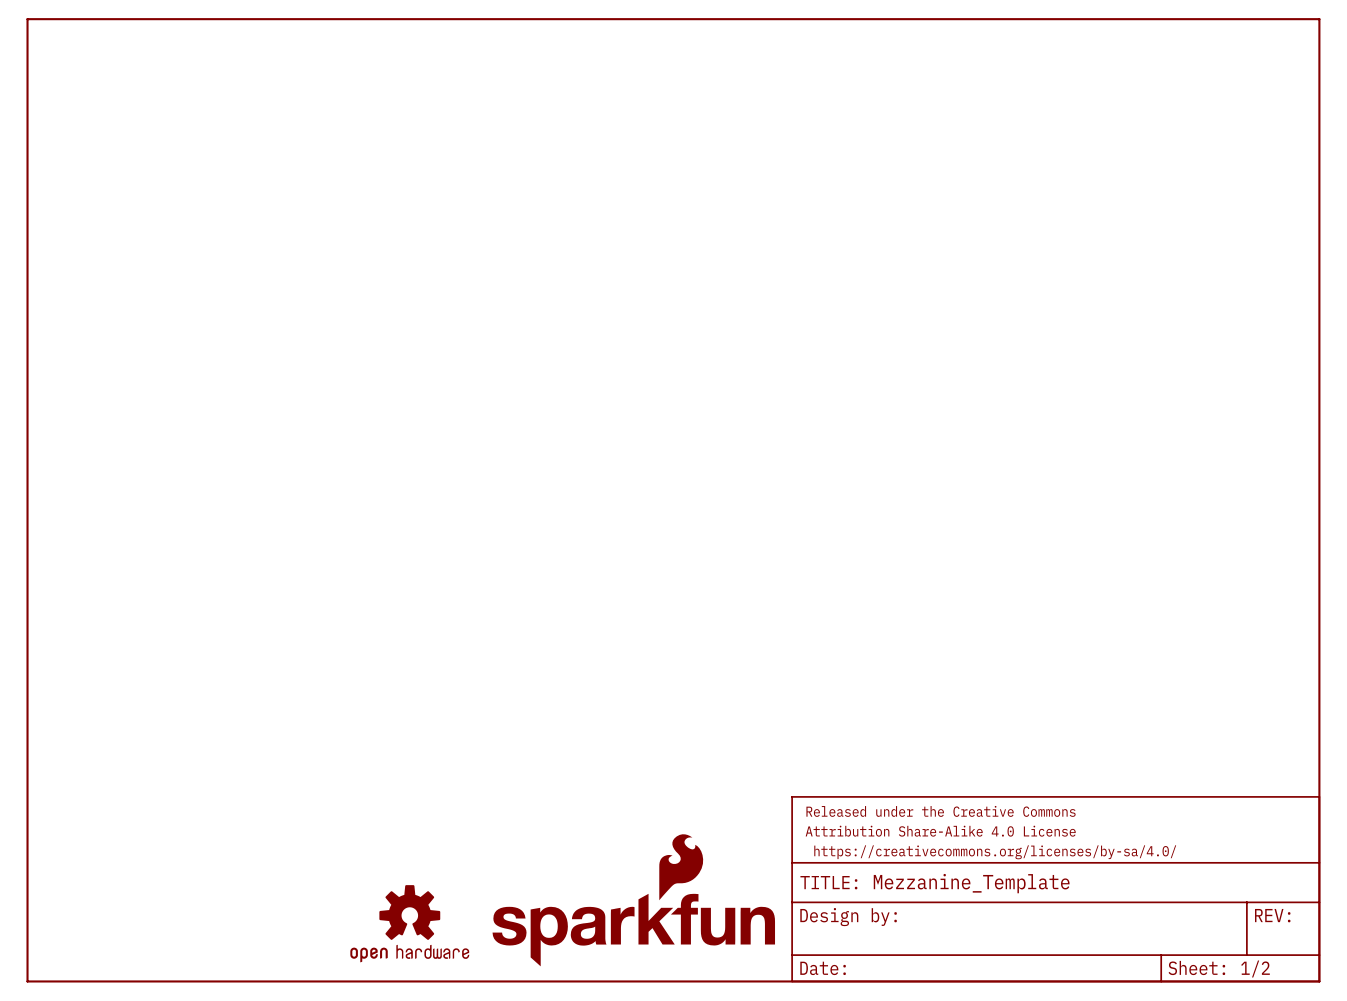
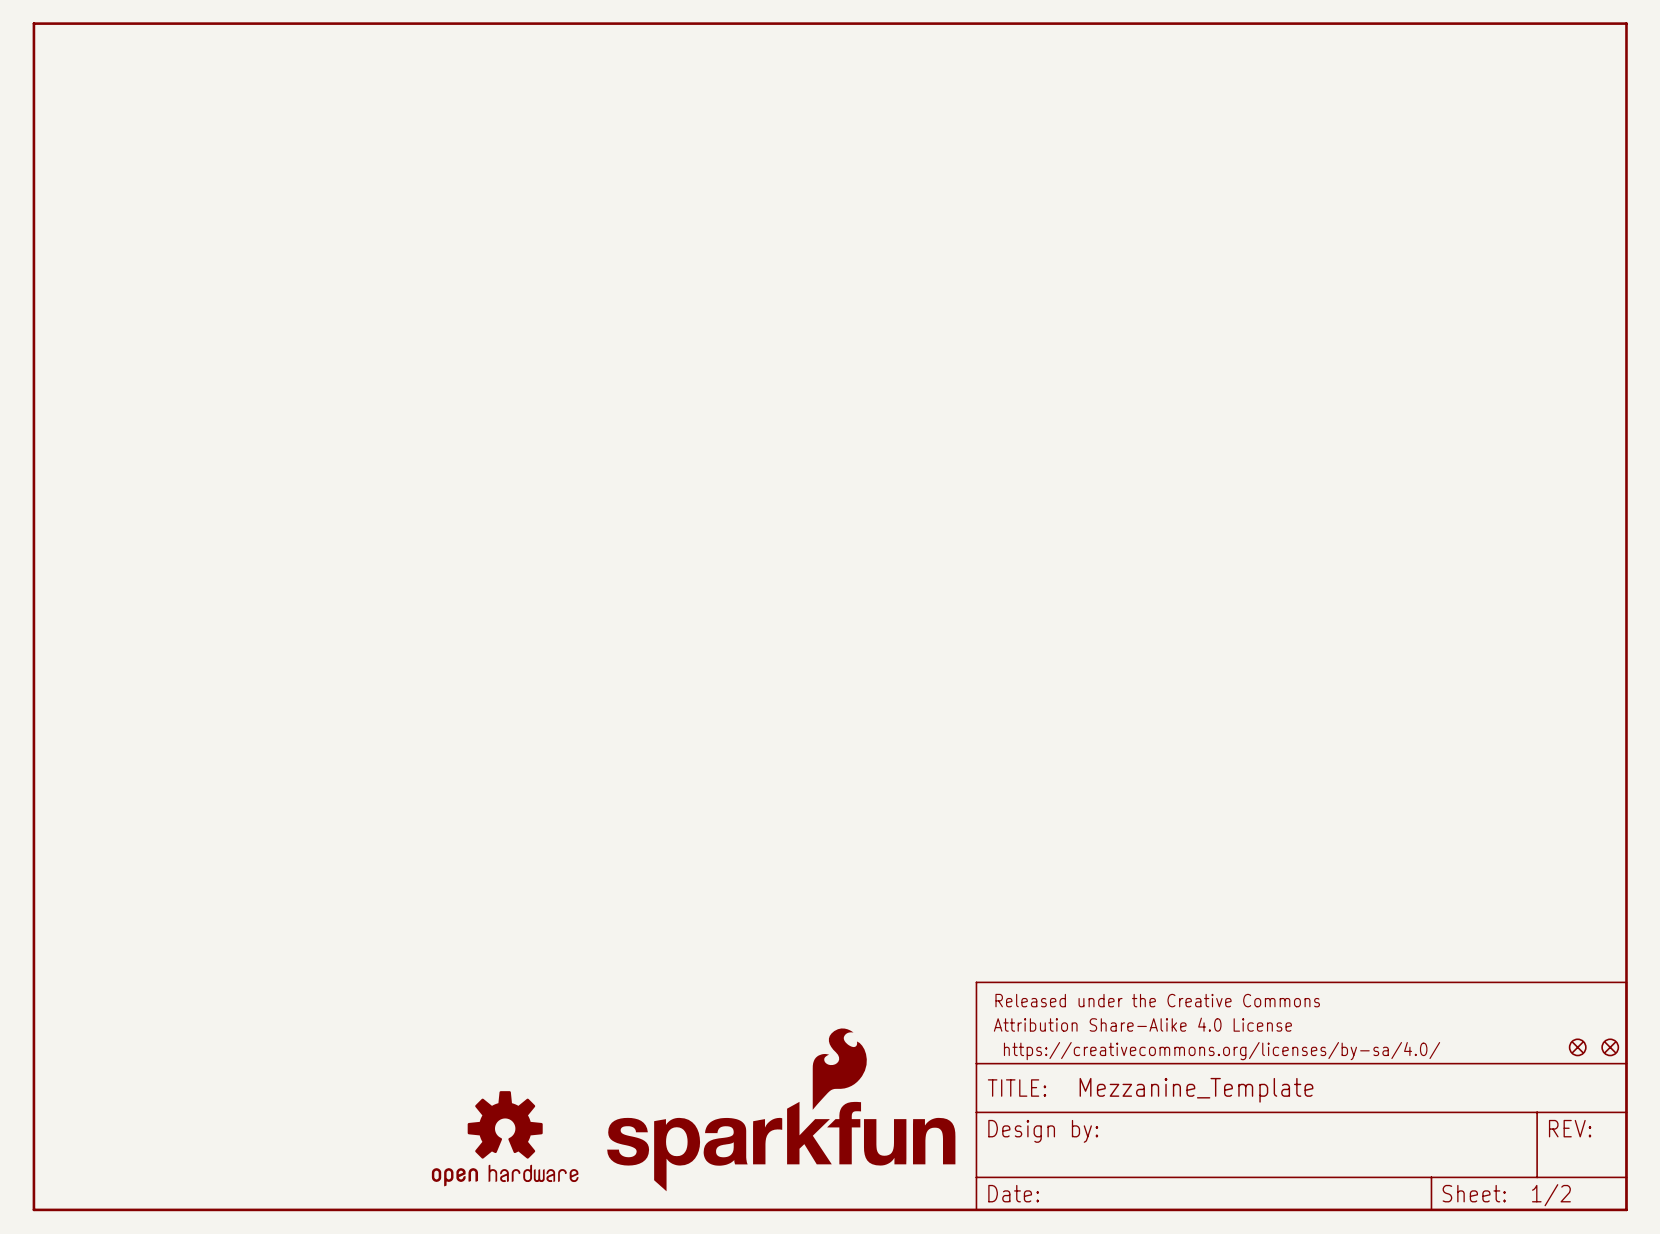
part: none -> (1577, 1047)
part: none -> (1610, 1047)

